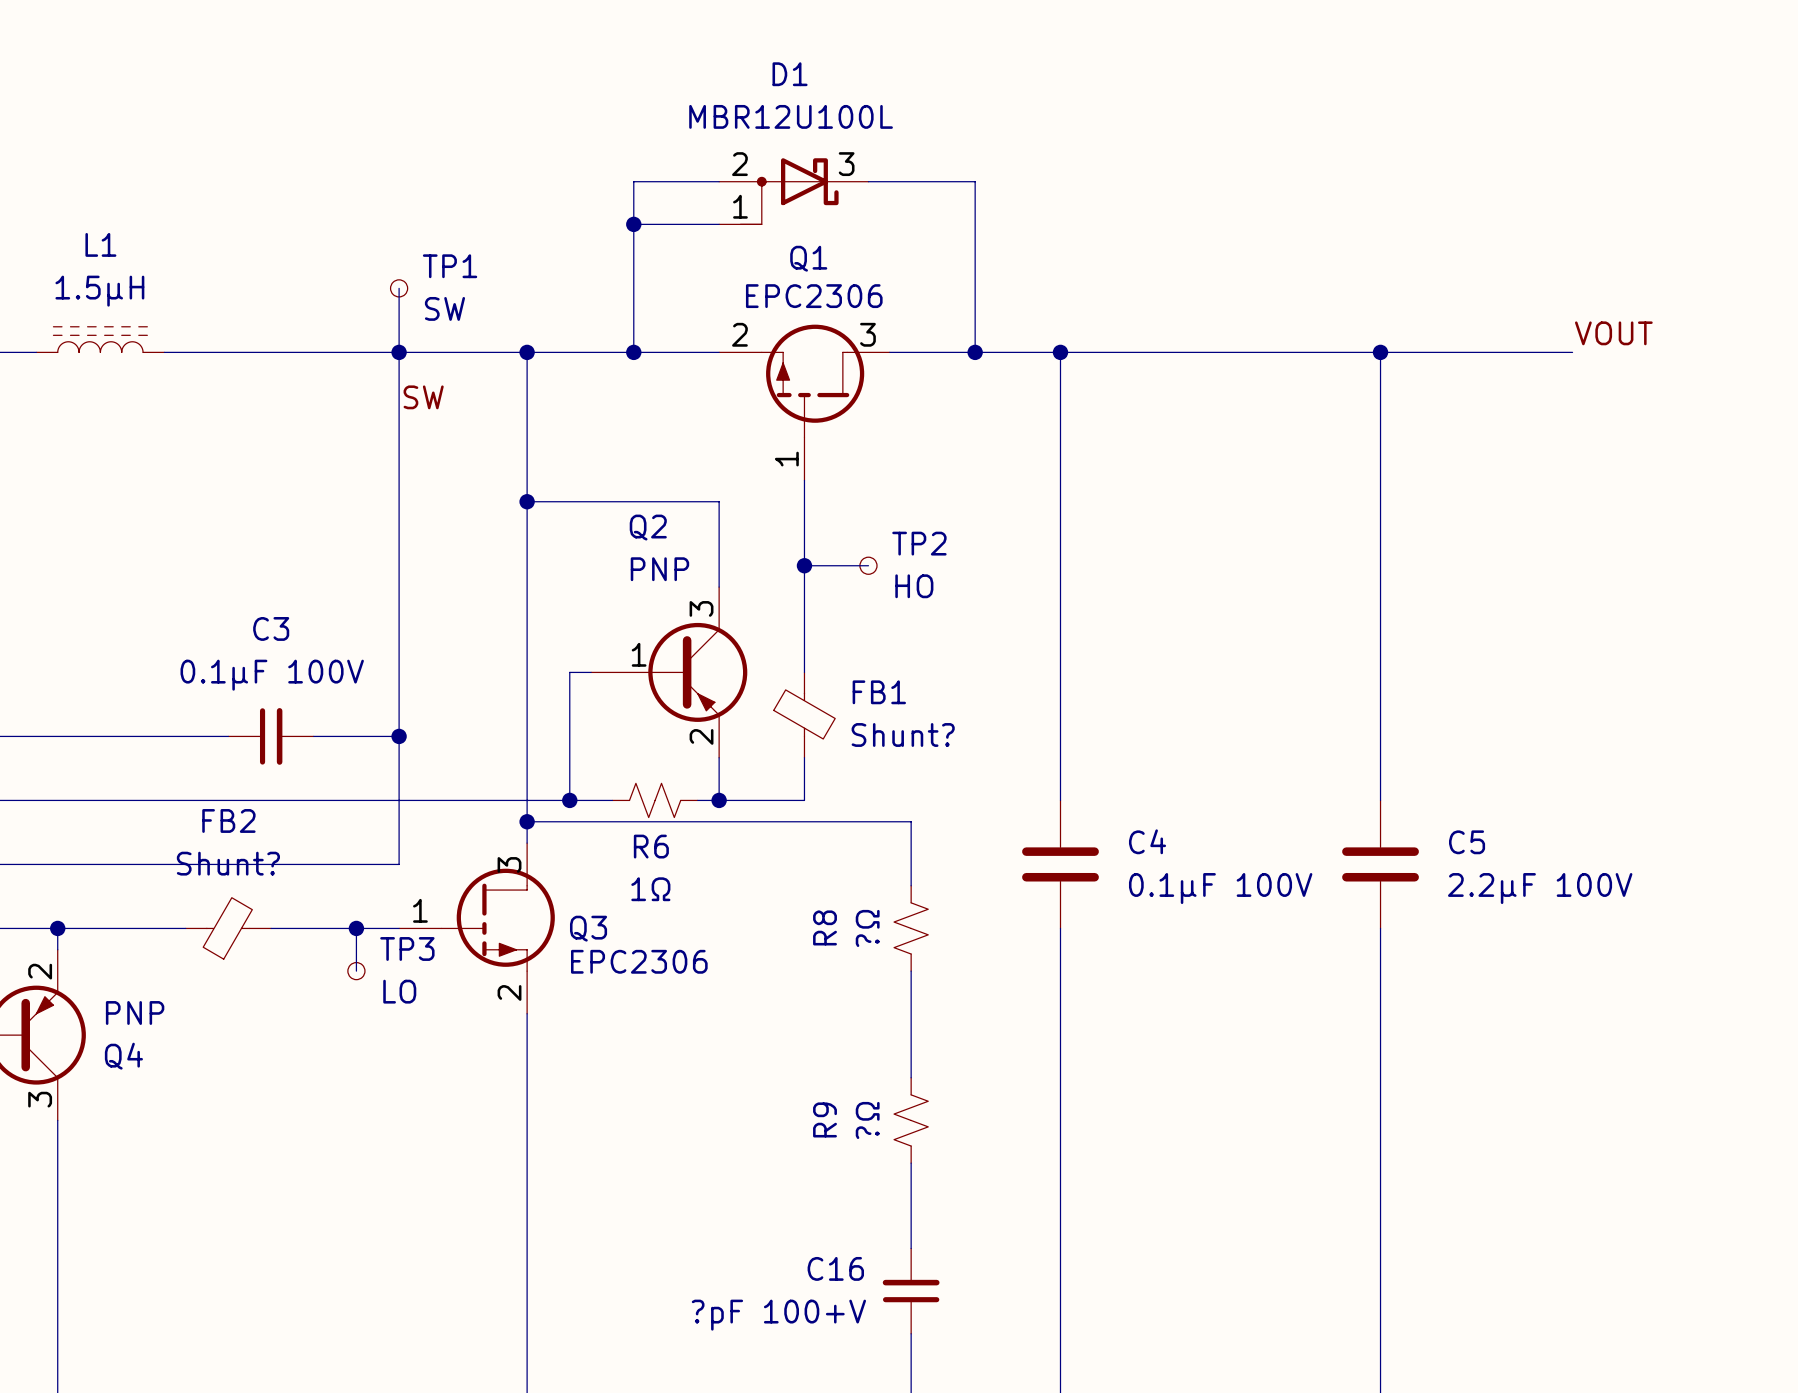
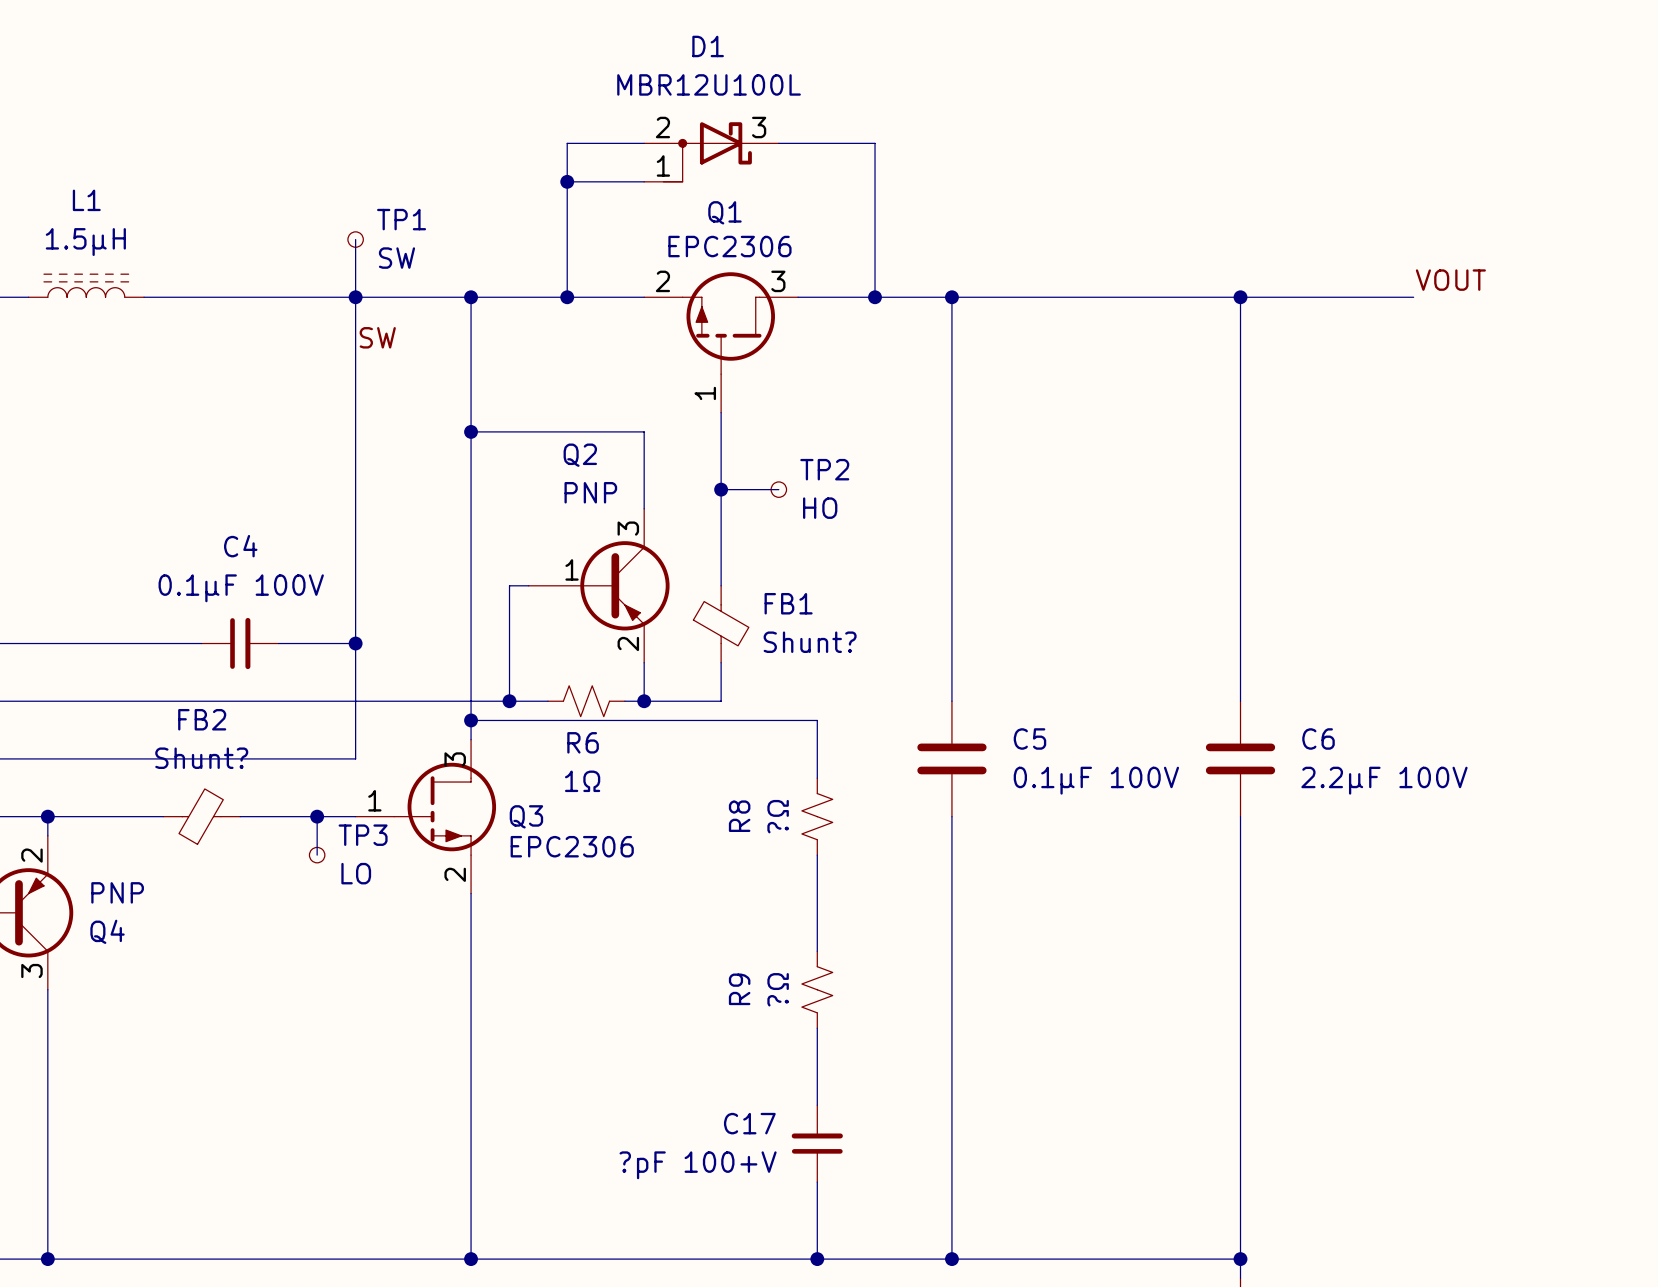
C3 name: C3 (271, 628) -> C4 (240, 546)
C4 name: C4 (1147, 841) -> C5 (1029, 738)
C5 name: C5 (1467, 842) -> C6 (1318, 738)
C16 name: C16 (835, 1268) -> C17 (749, 1123)

